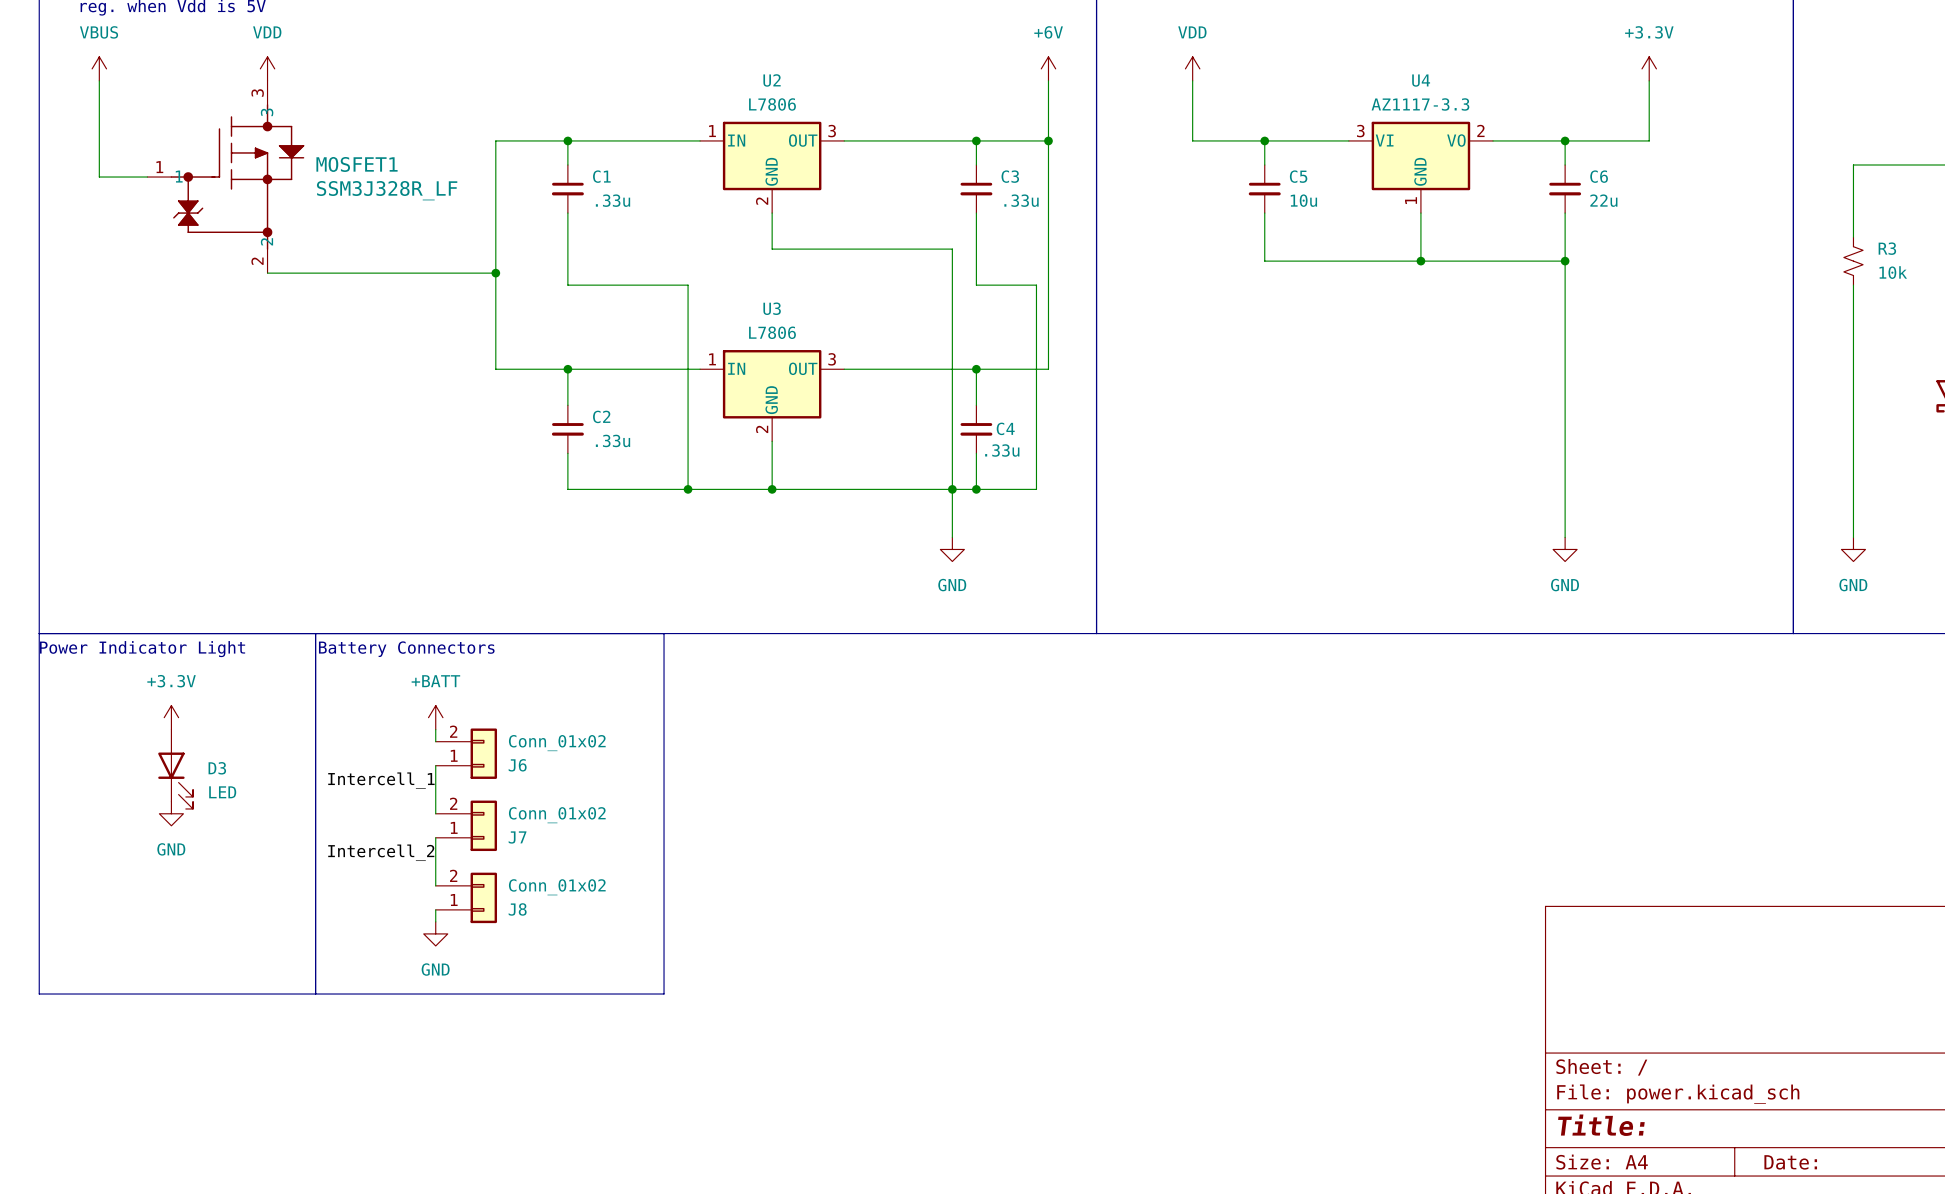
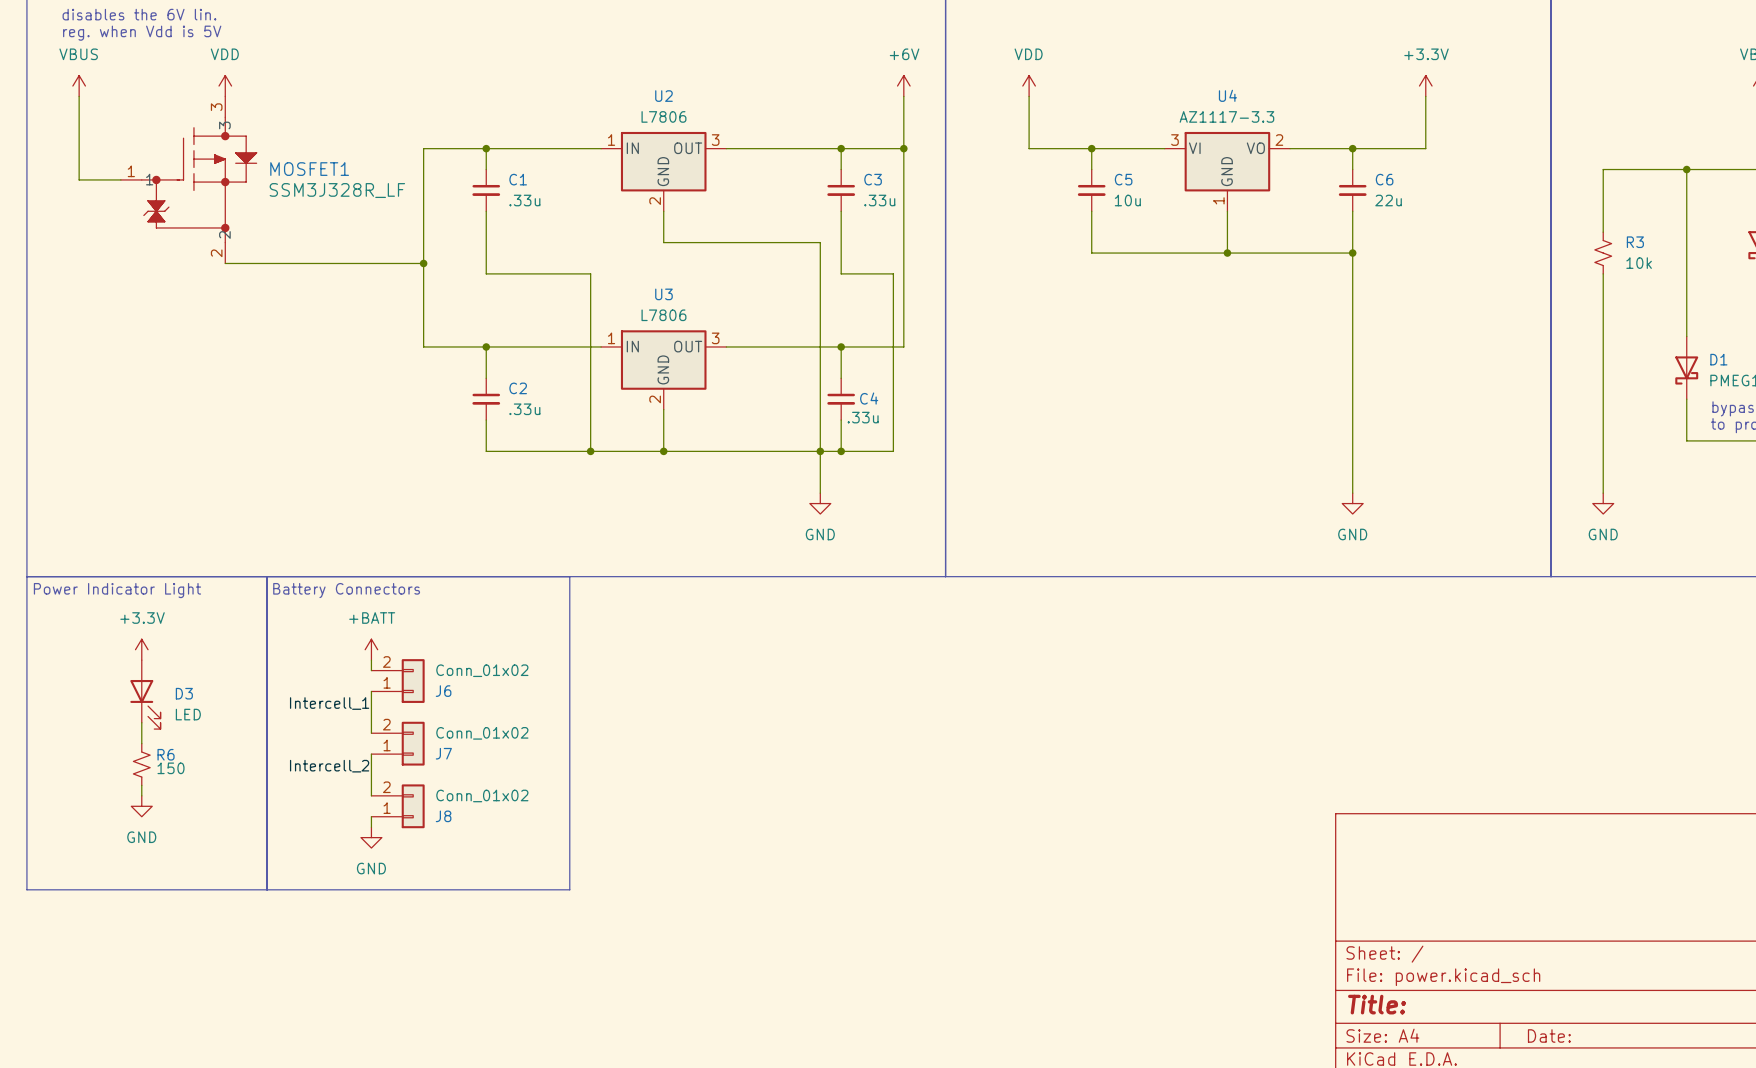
power symbol position: GND (171, 813) -> GND (141, 806)
R6: none -> 150 (141, 764)
wire: none -> (141, 785) (141, 795)

